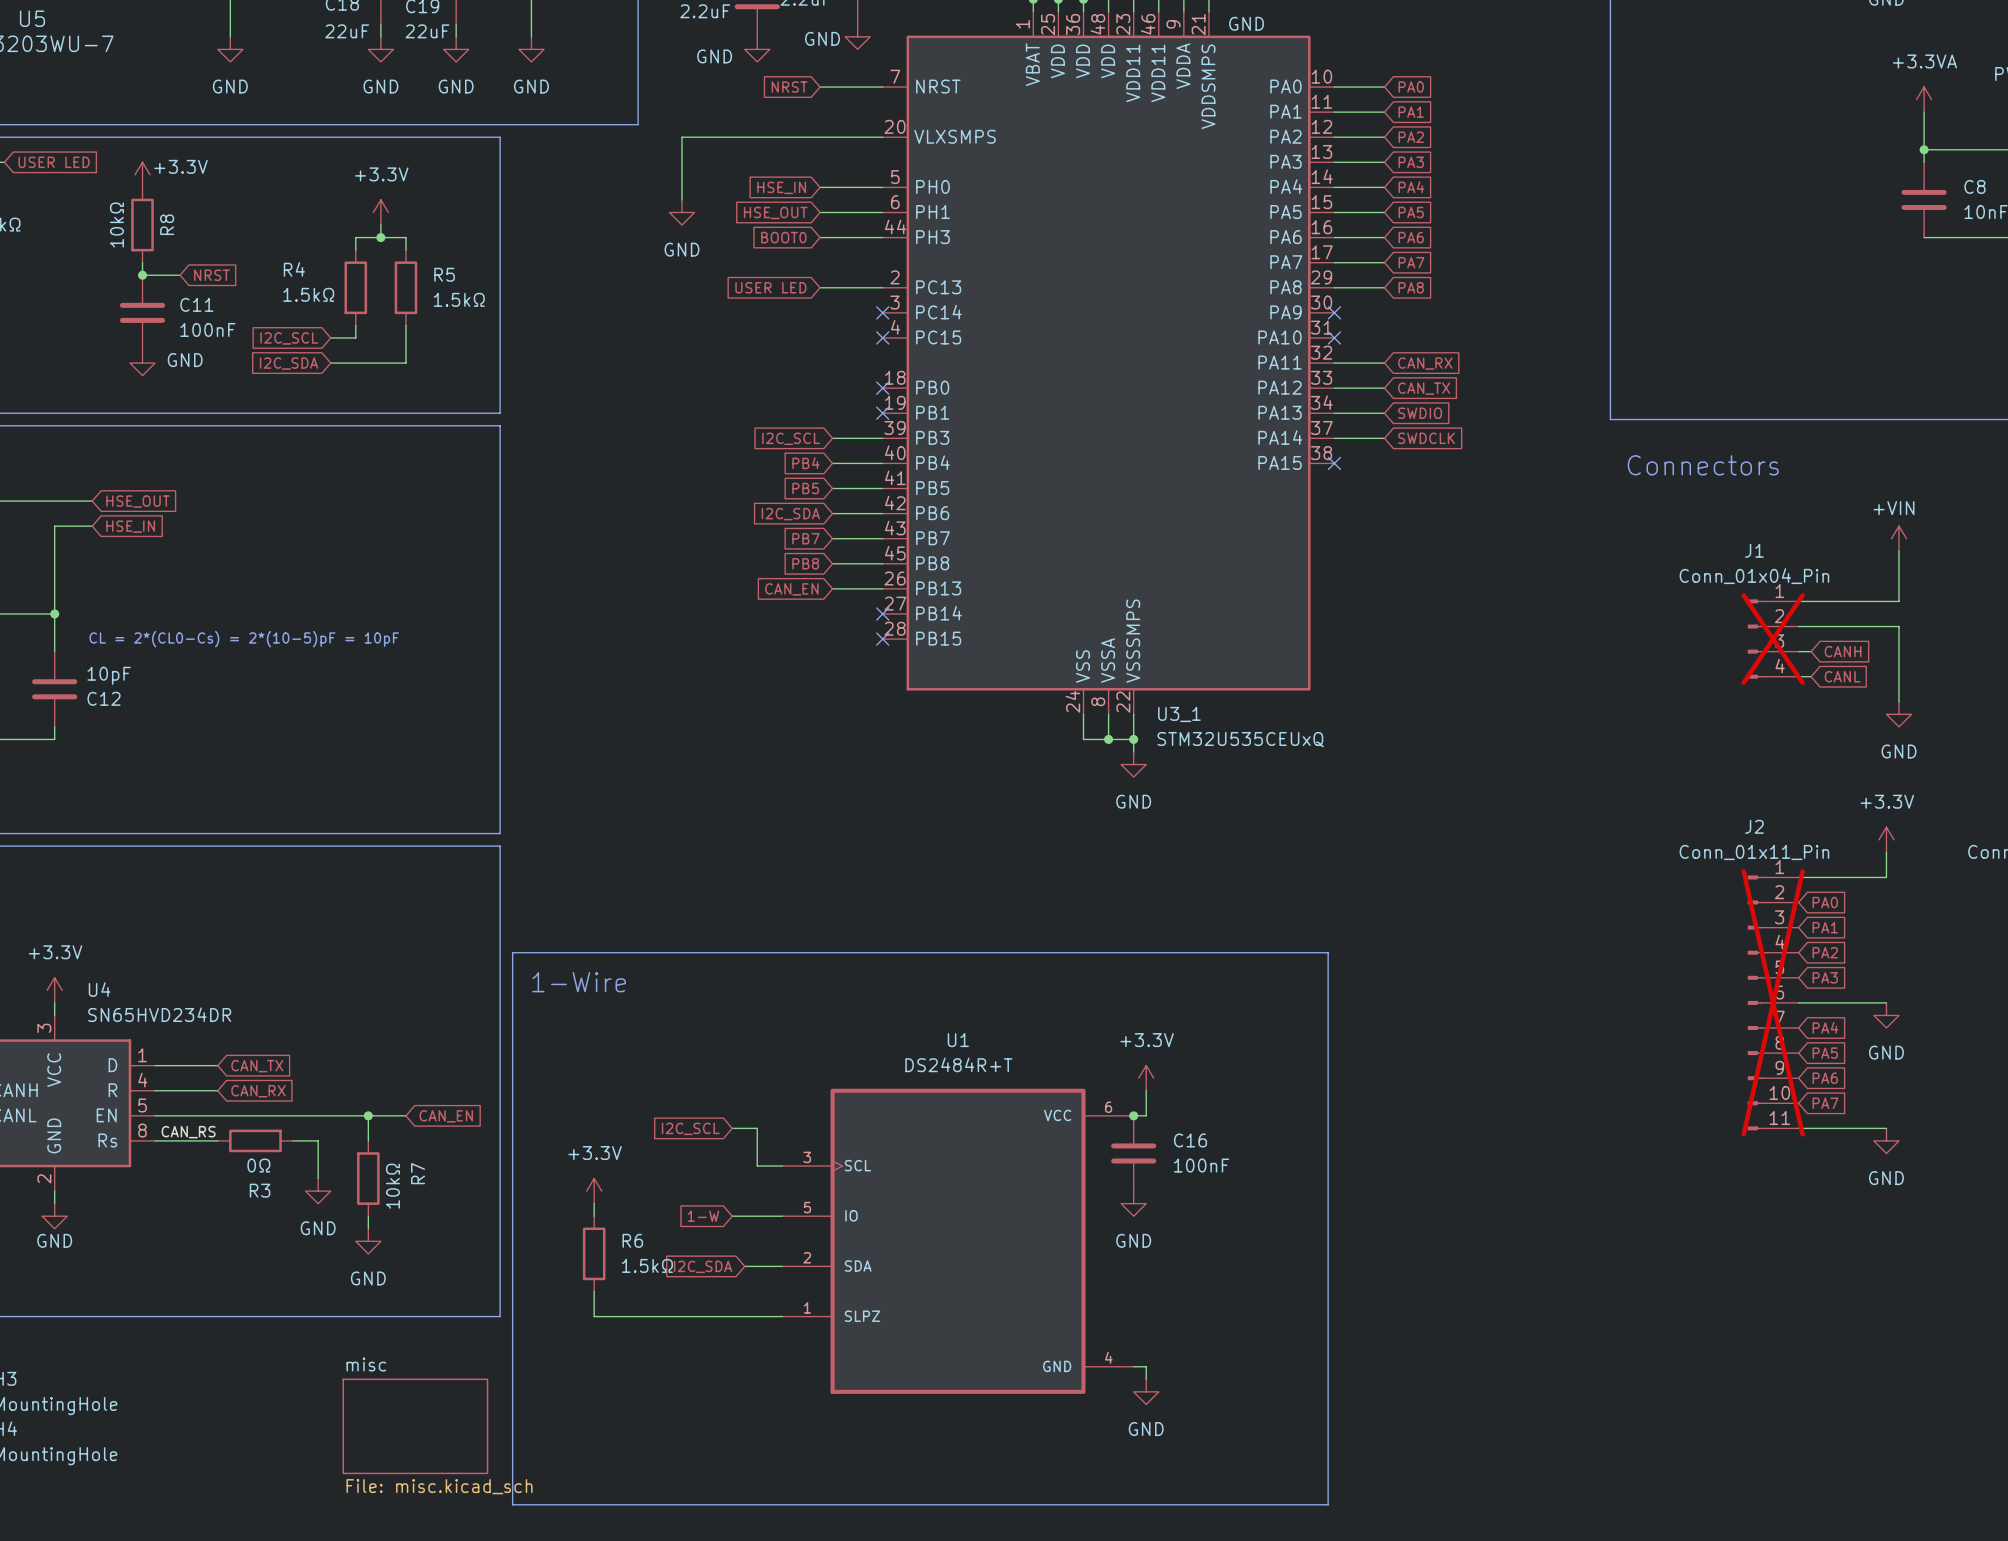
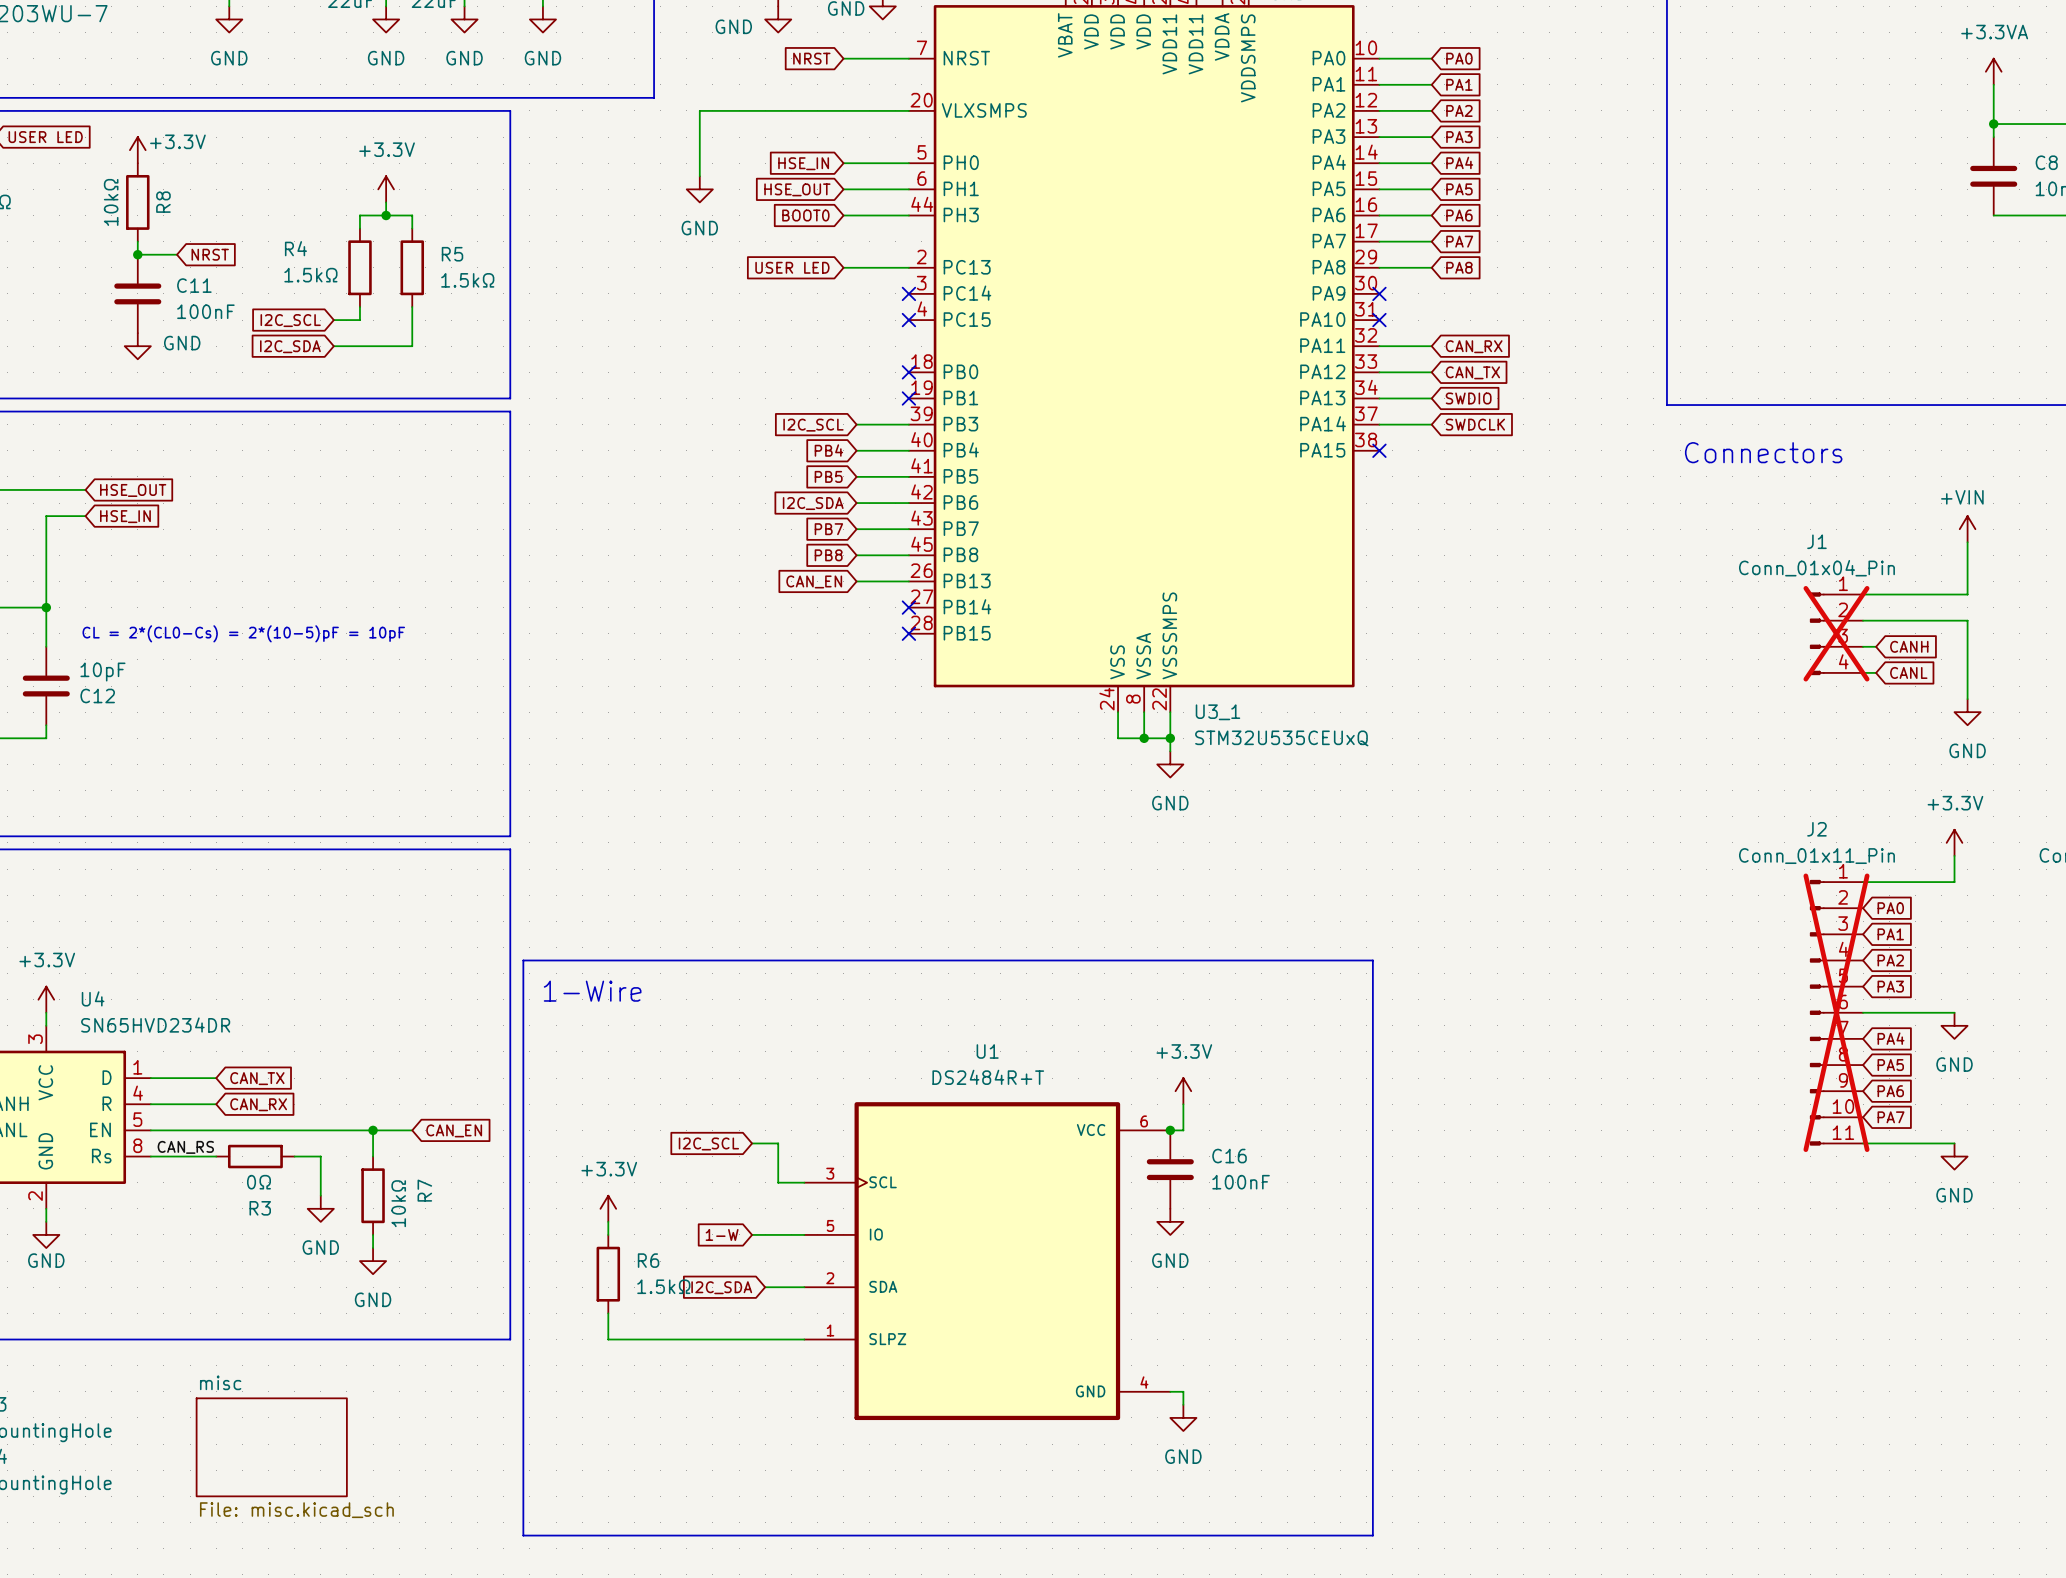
sheet misc position: (415, 1426) -> (271, 1447)

